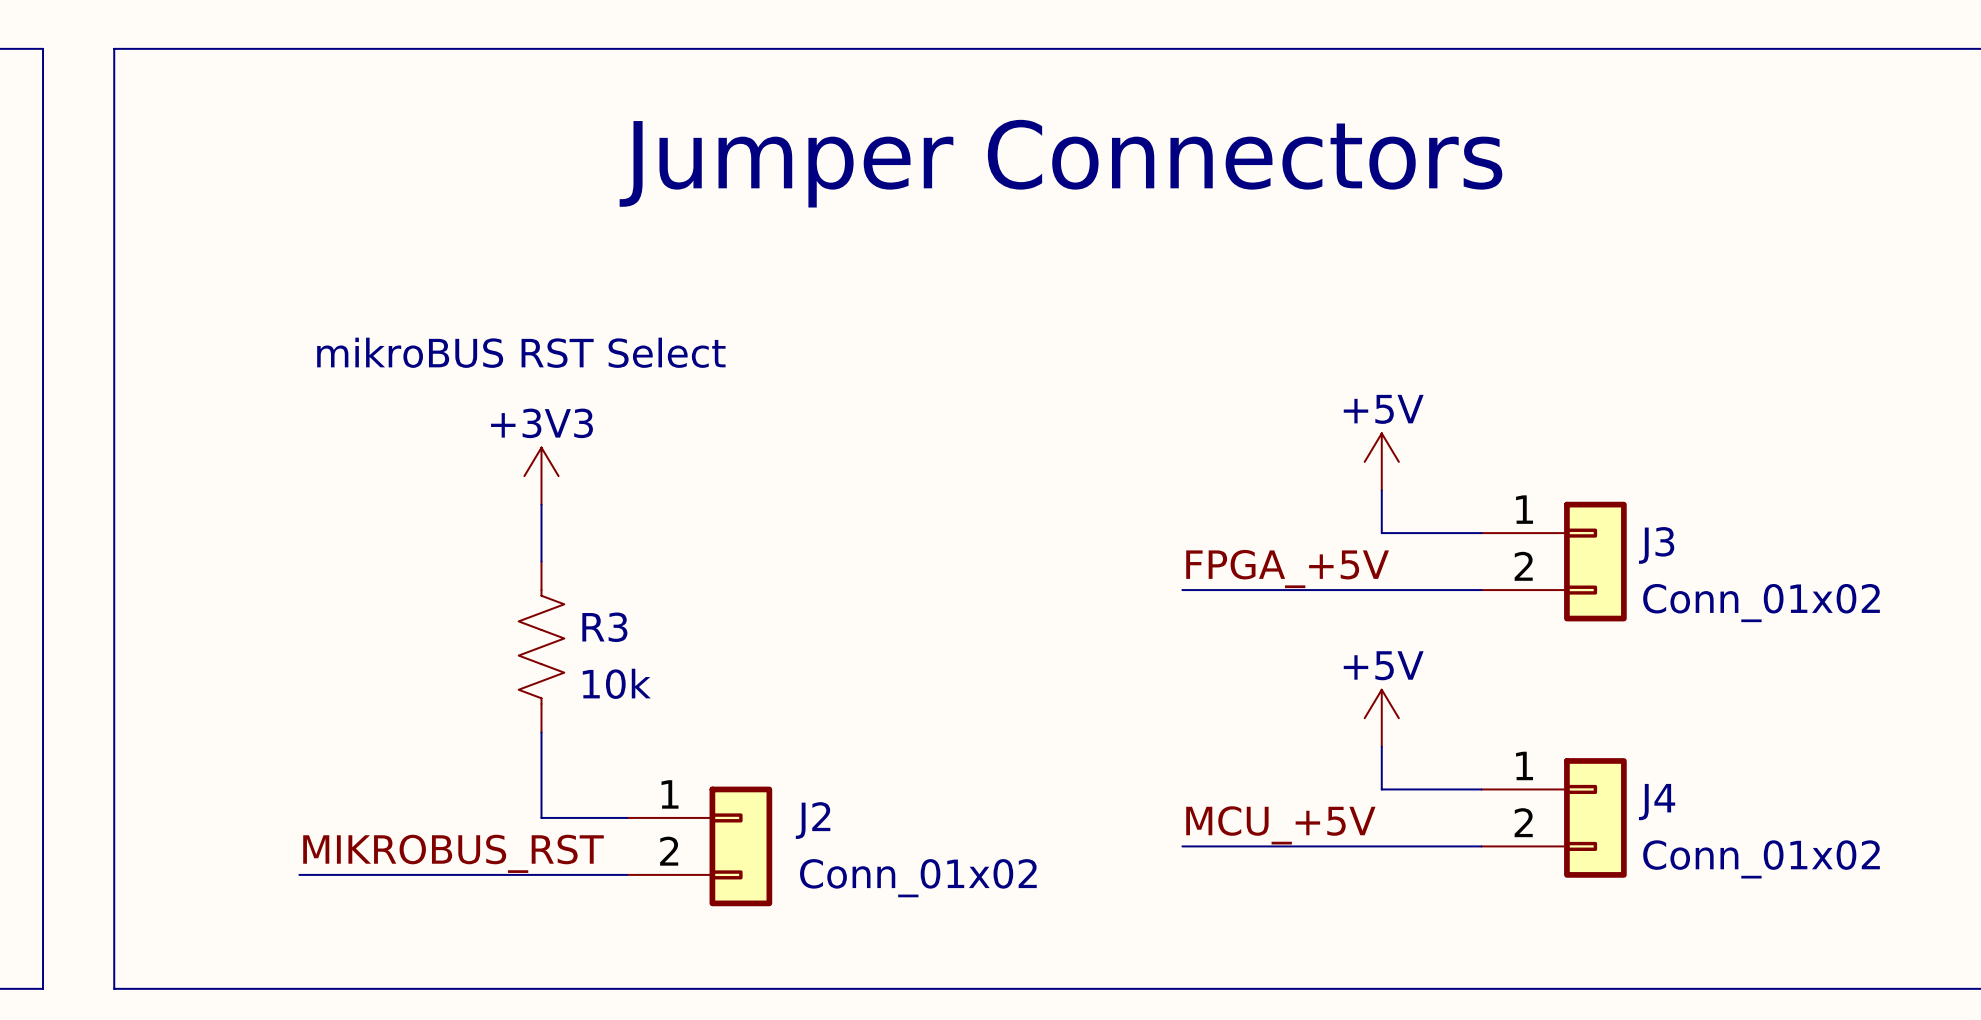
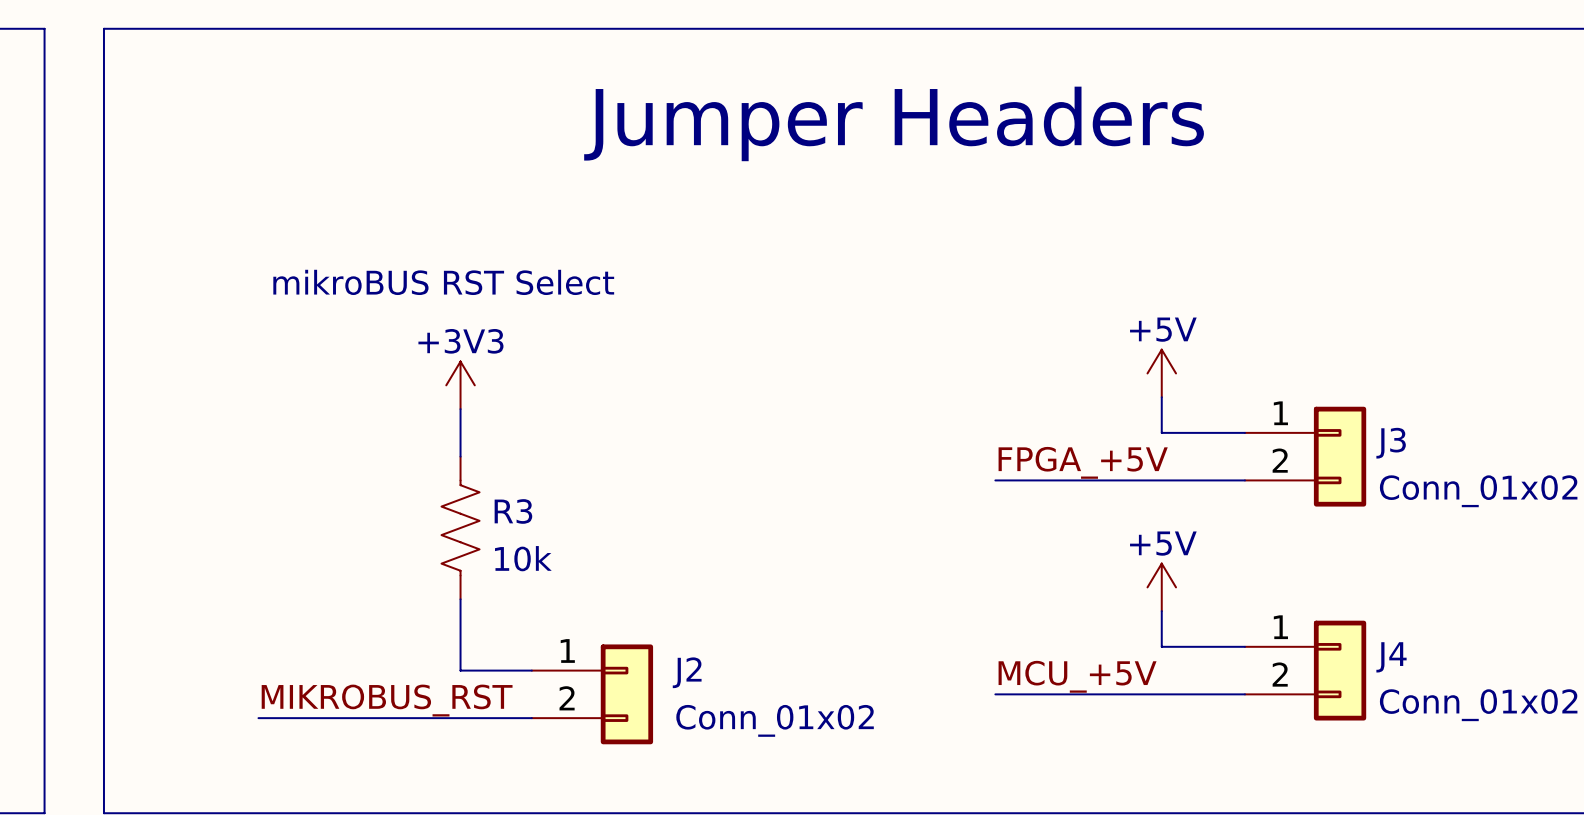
text: Jumper Connectors (1060, 163) -> Jumper Headers (894, 123)

